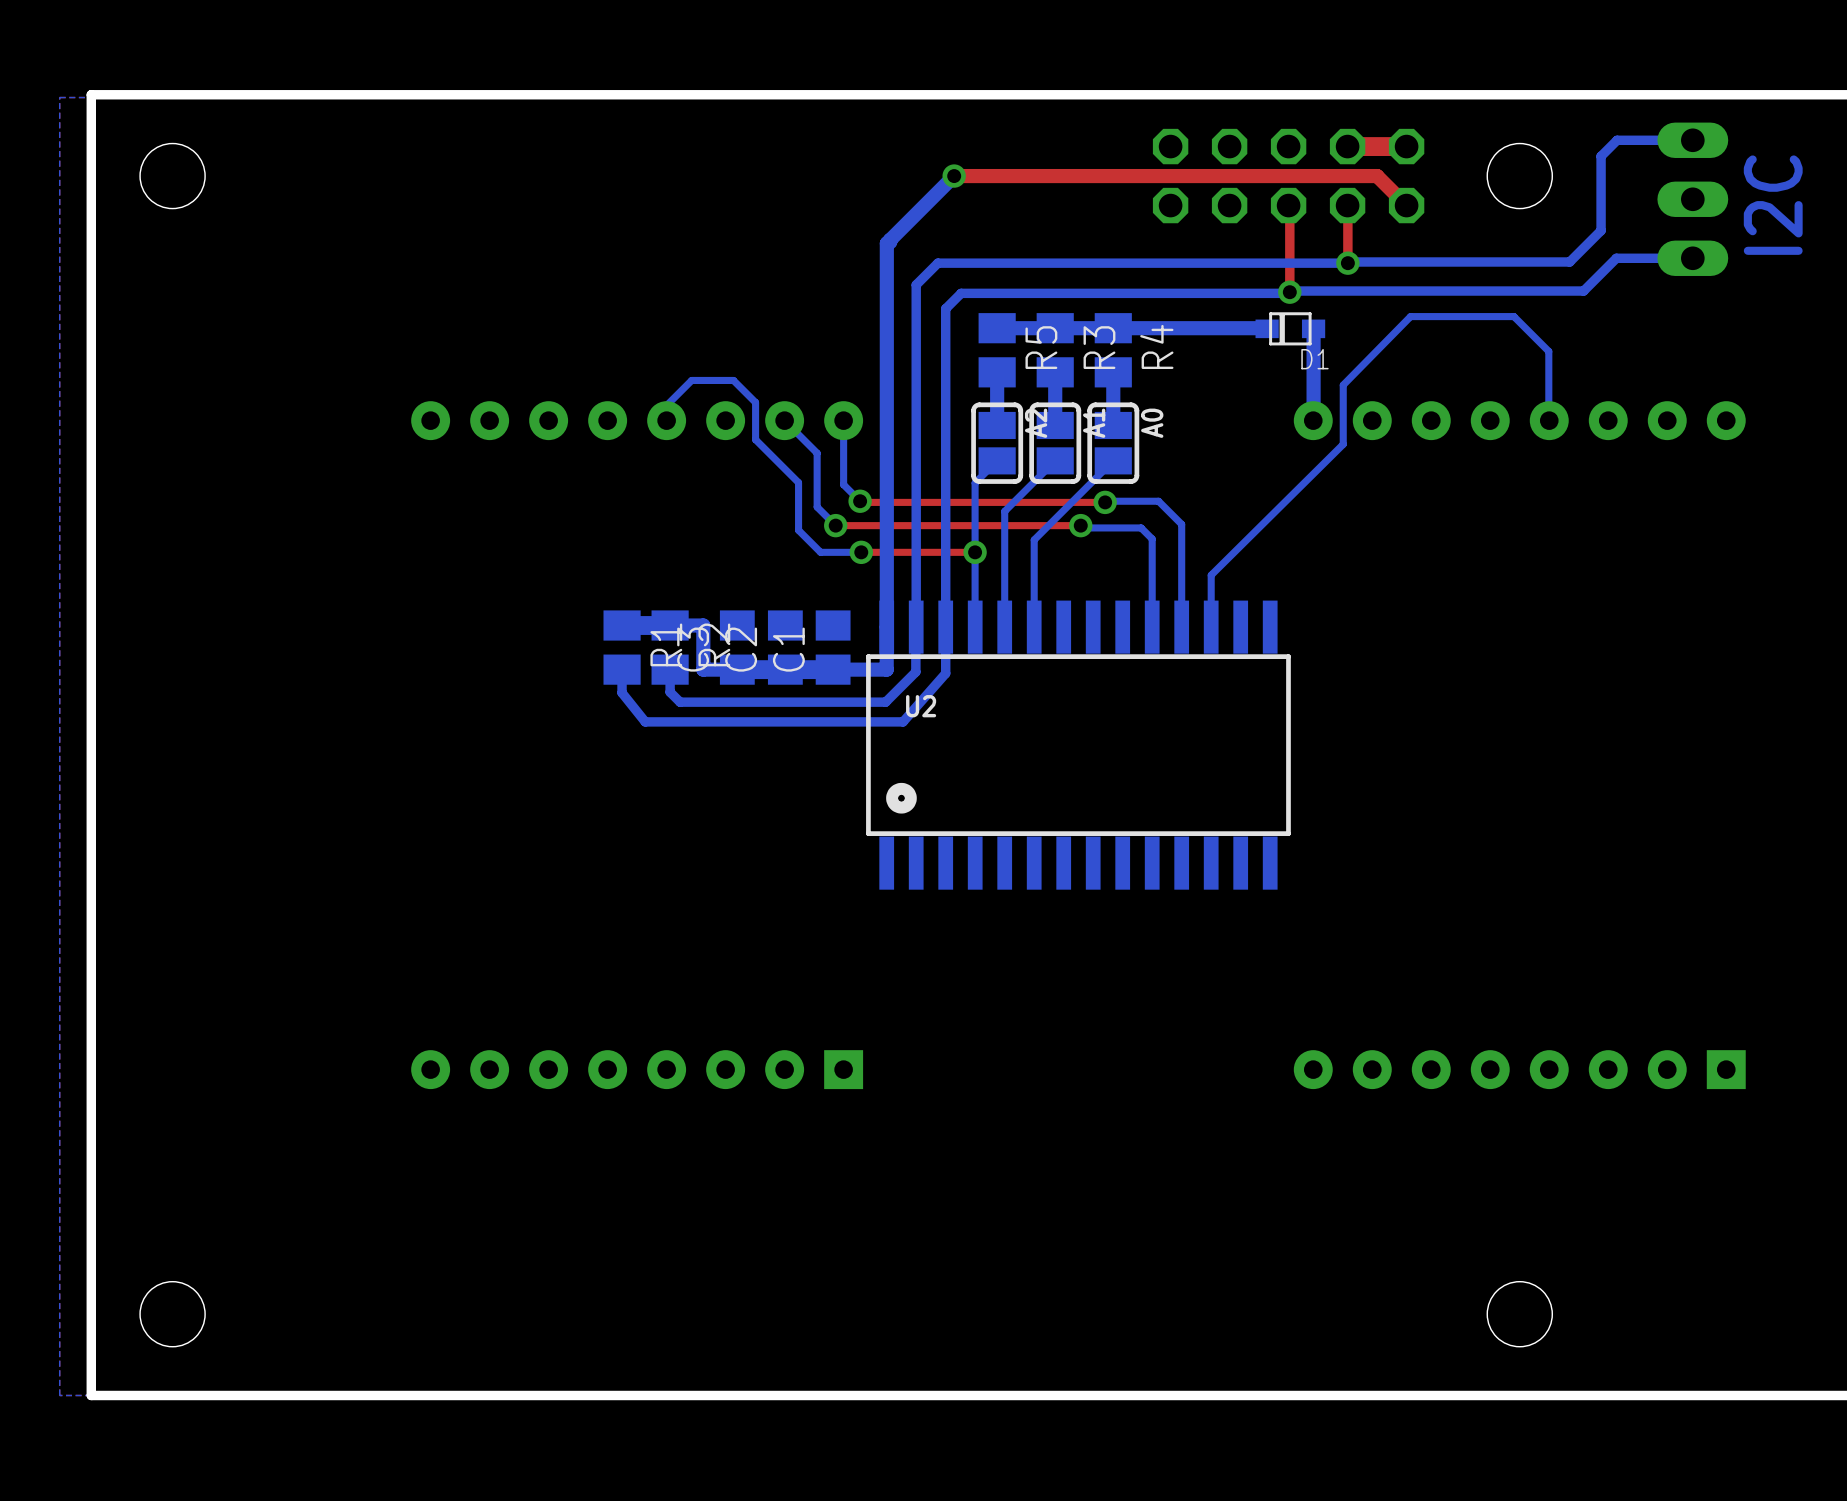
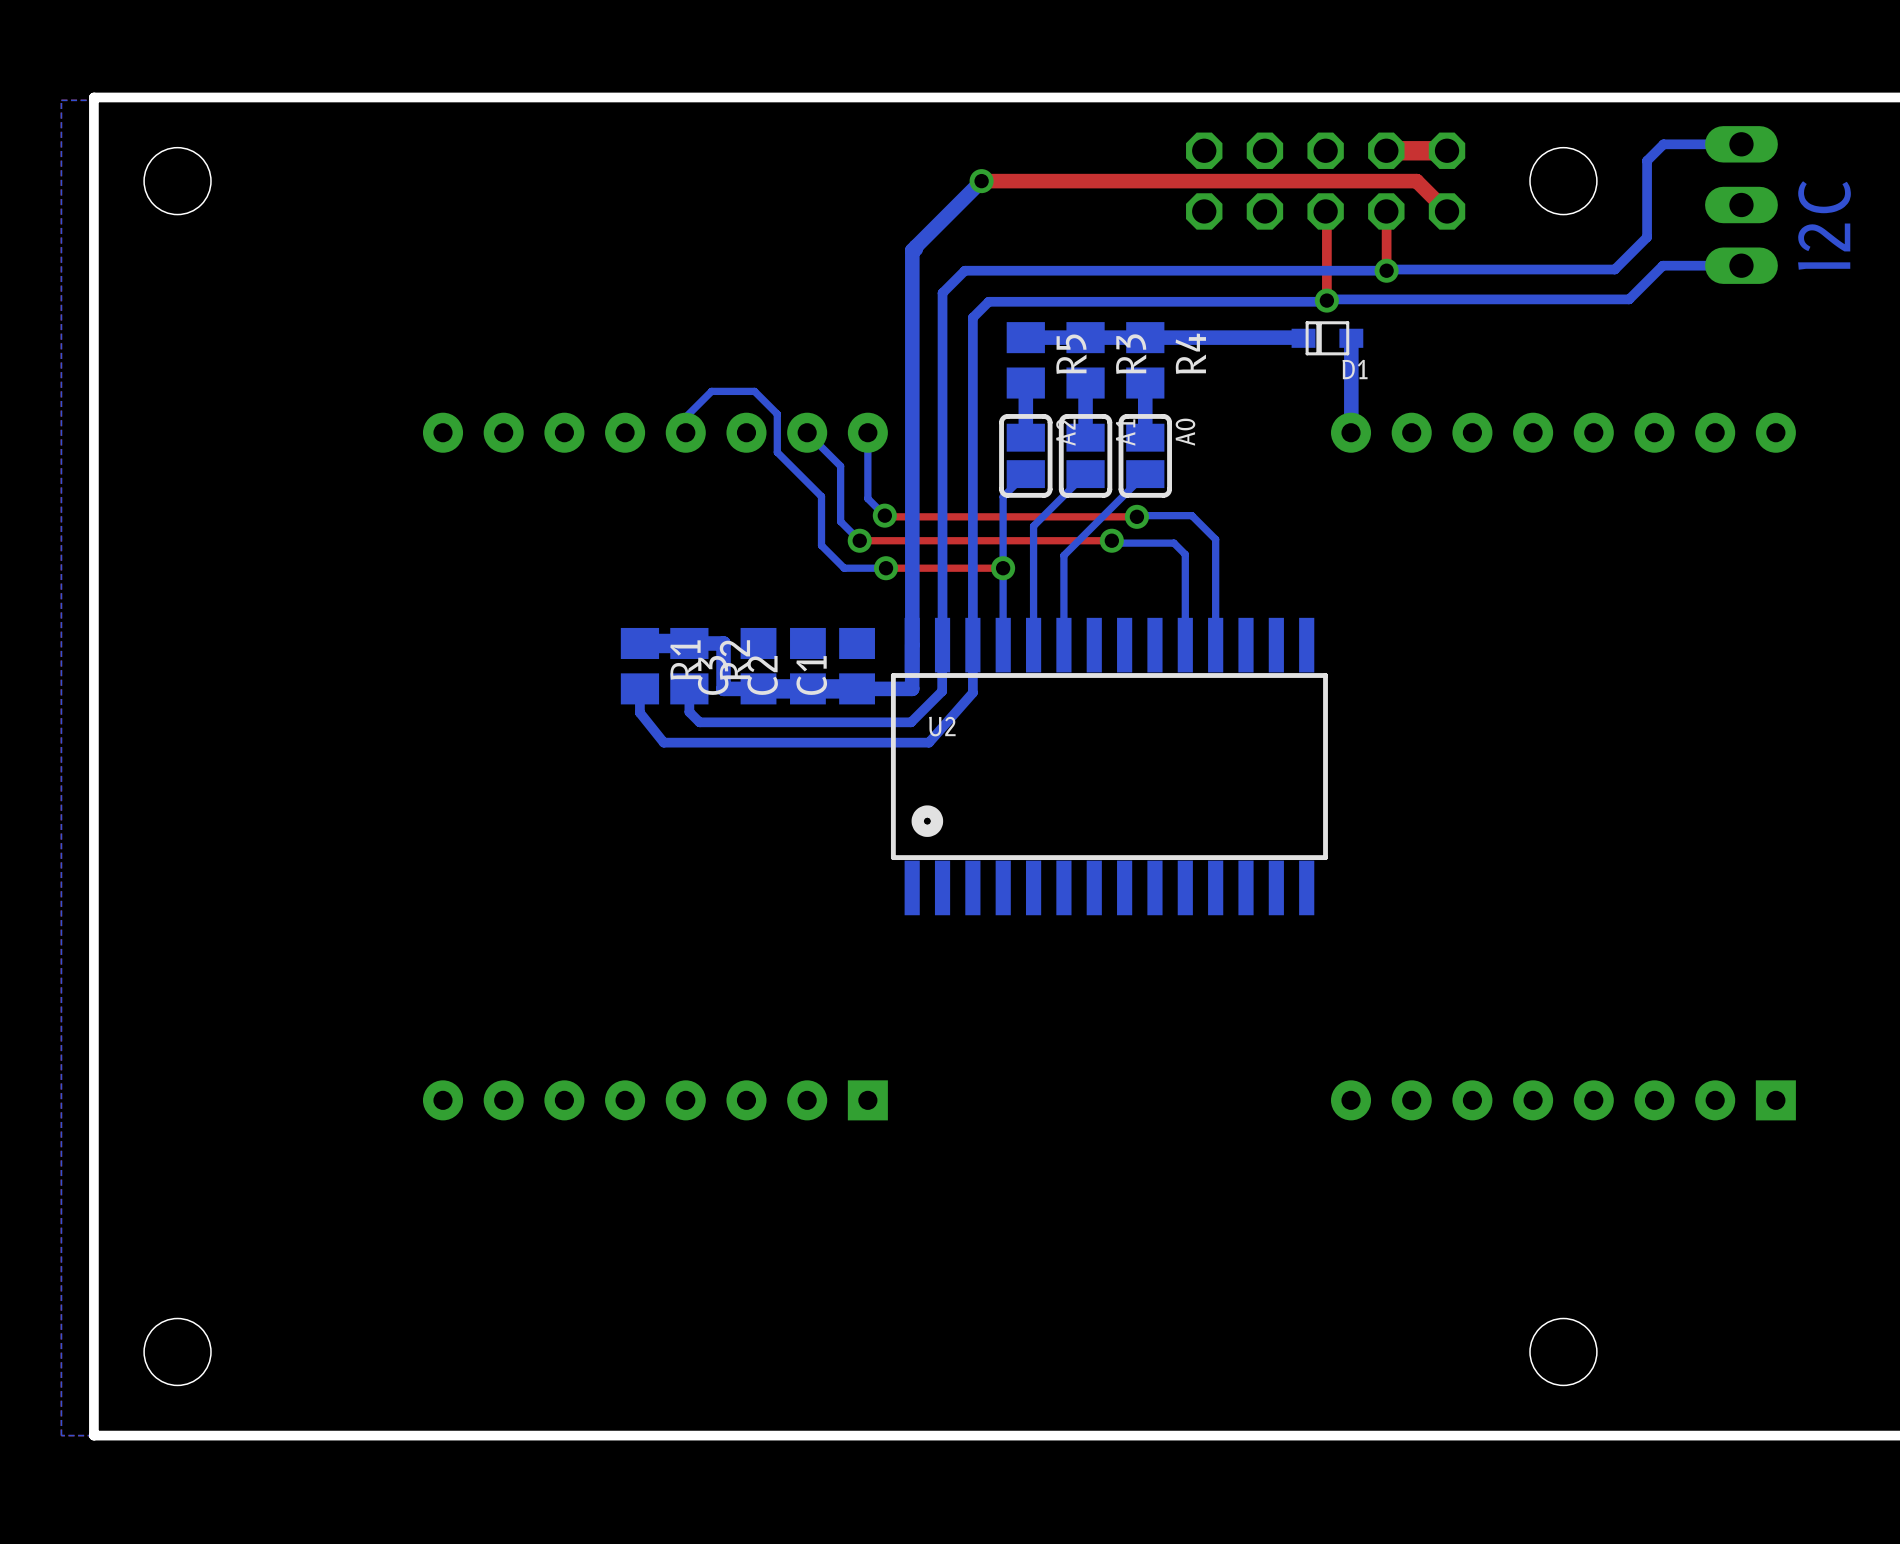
bottom track: (1549, 420) (1548, 351) (1513, 316) (1410, 316) (1343, 385) (1343, 444) (1211, 575) (1211, 627) -> none

